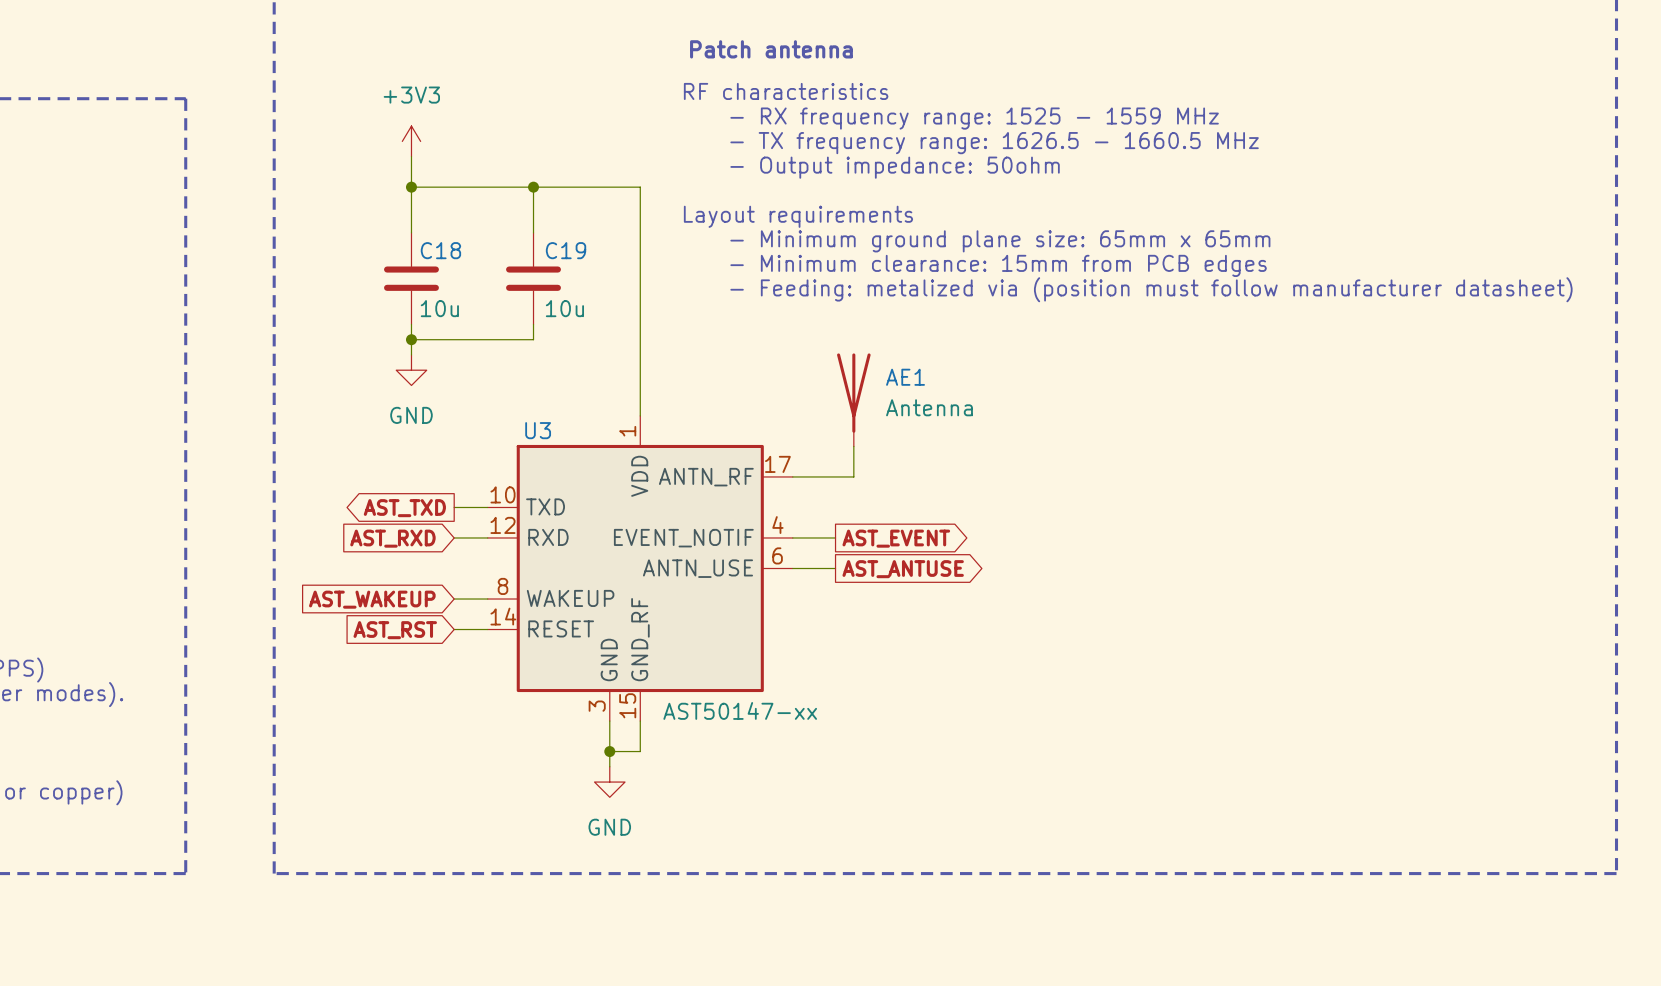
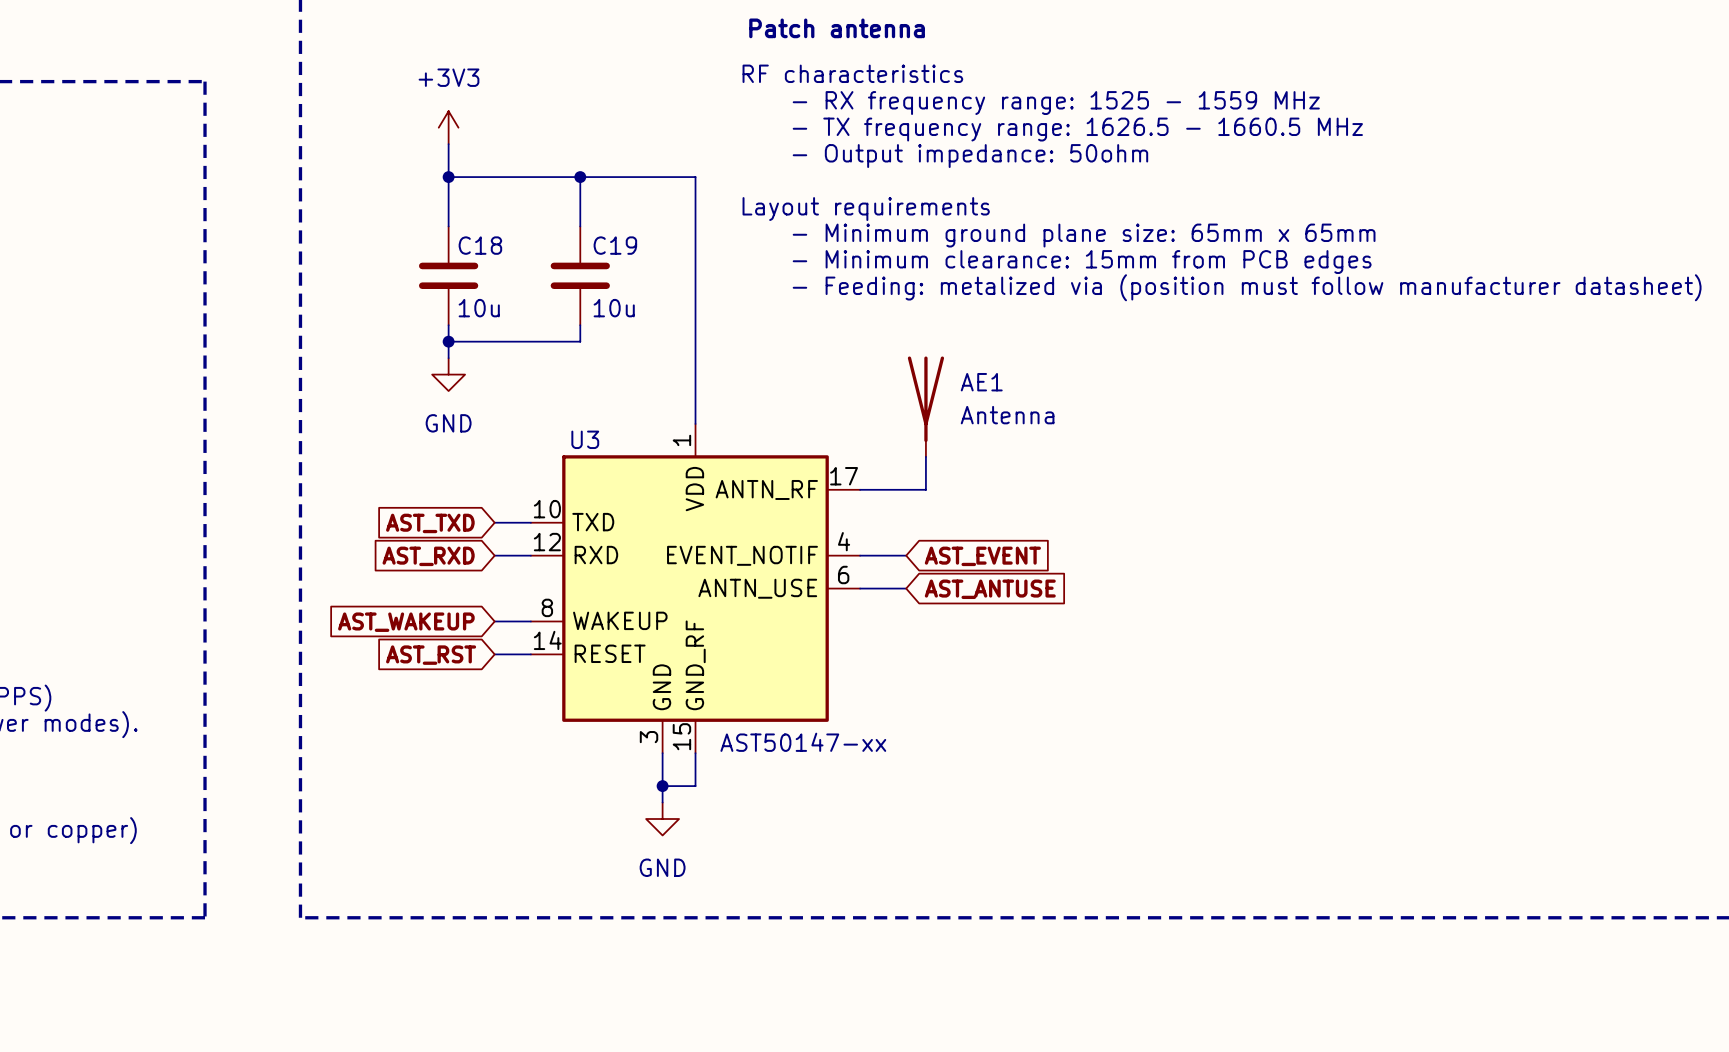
global label shape: output (404, 508) -> input (430, 523)
global label shape: output (896, 538) -> input (982, 556)
global label shape: output (903, 569) -> input (990, 589)

